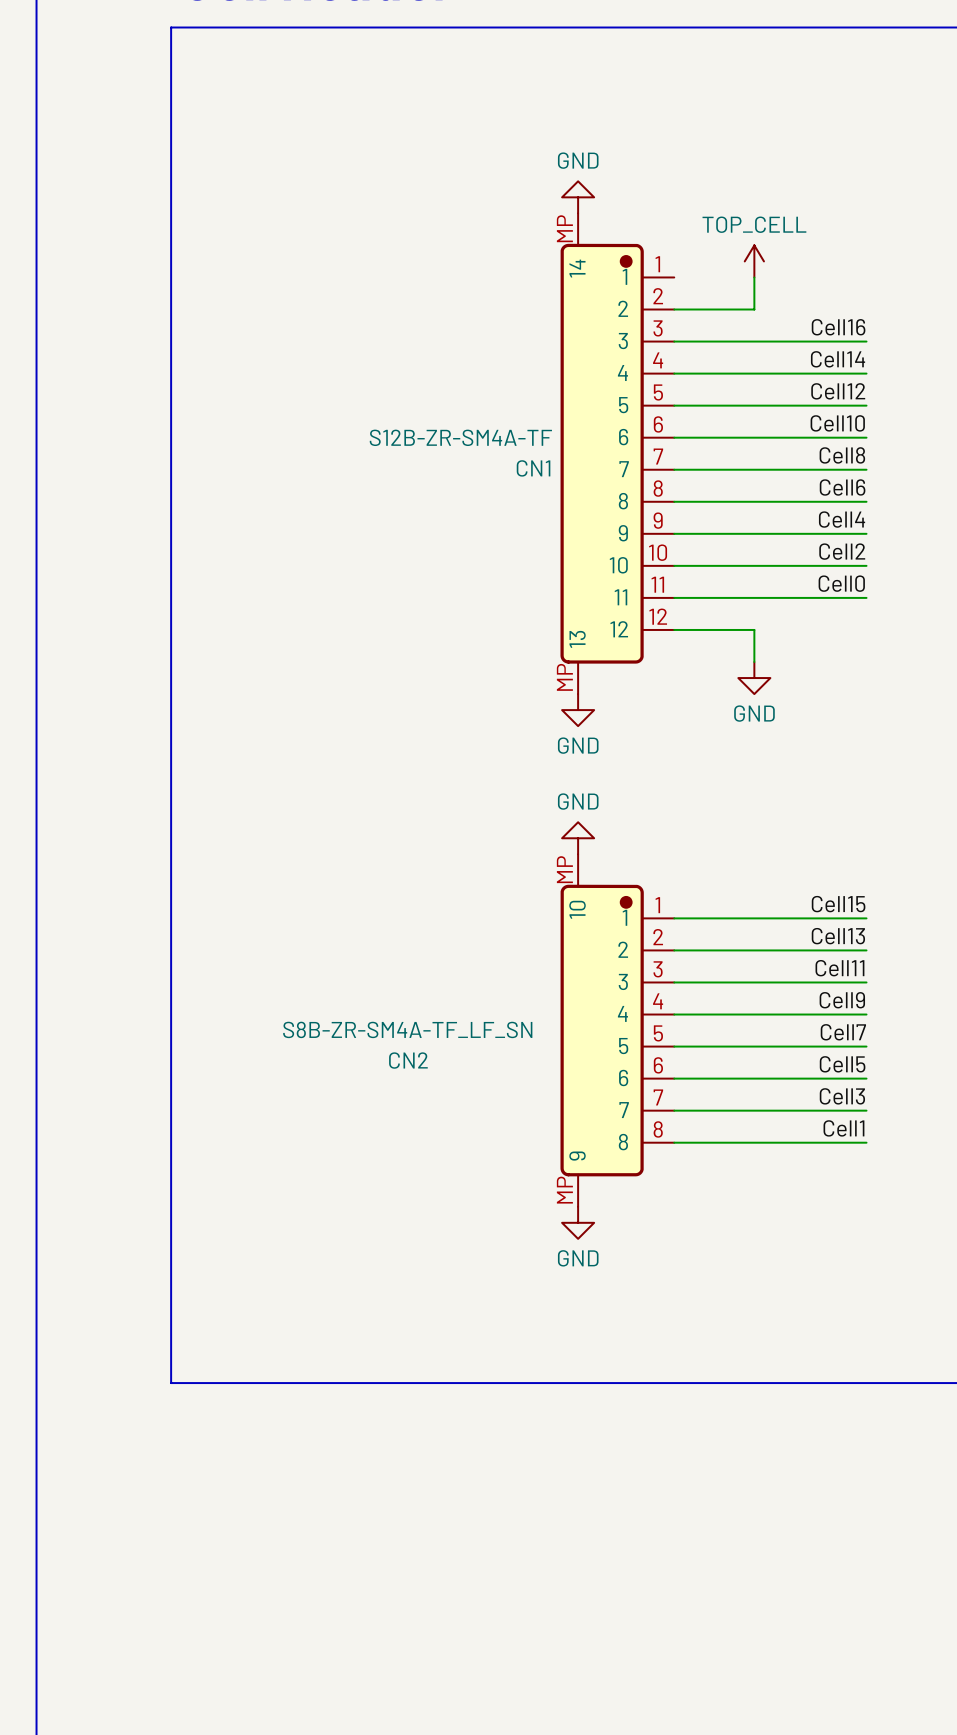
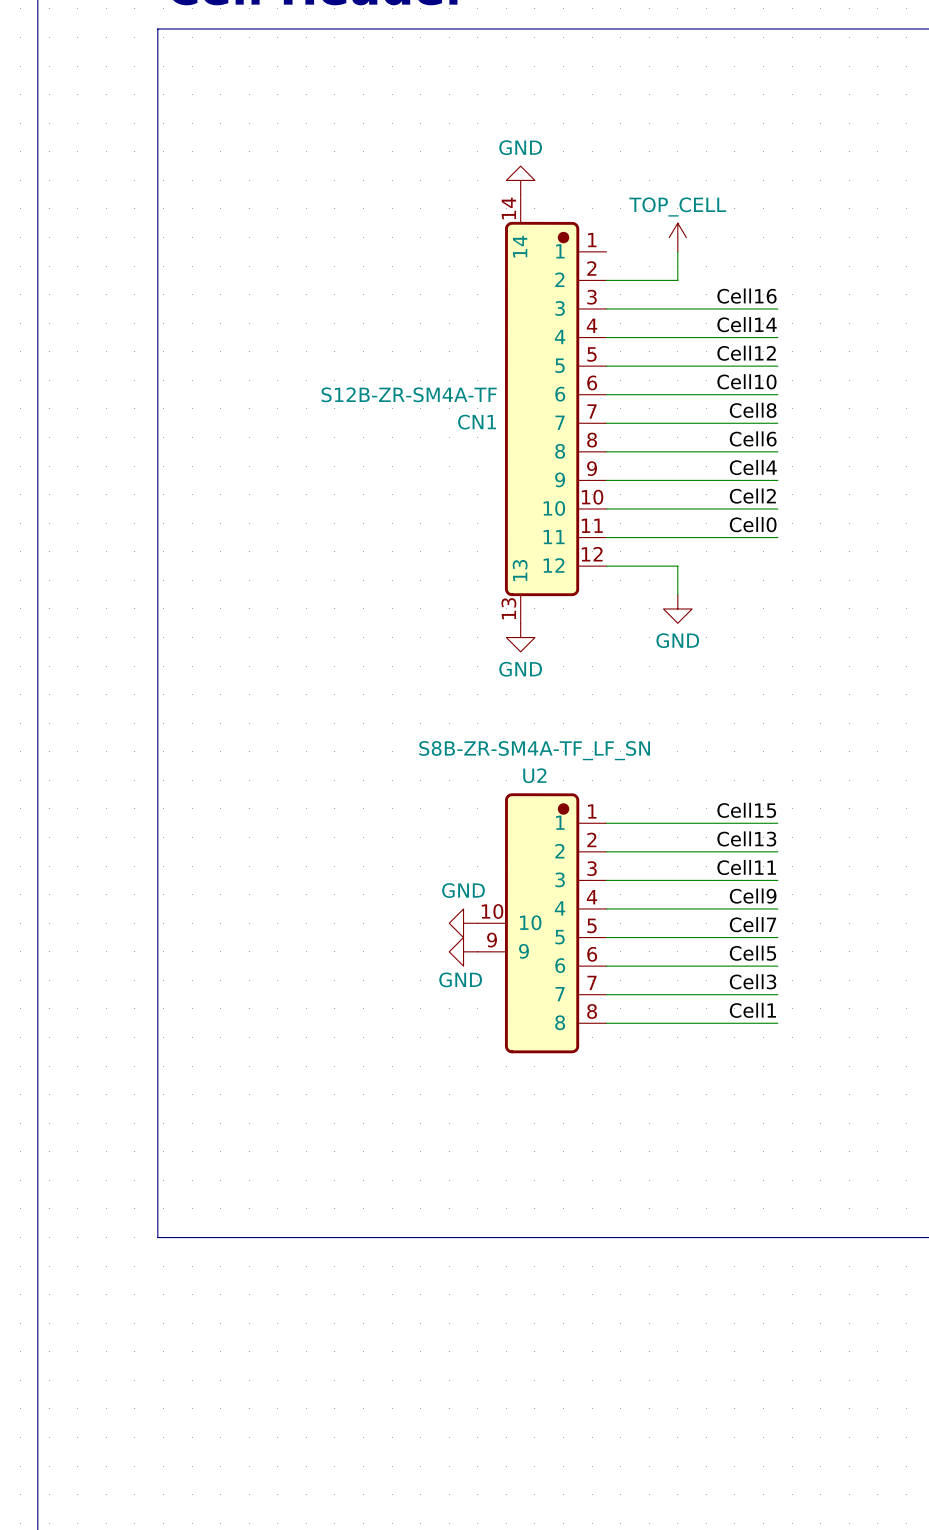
CN1 pin number: MP (564, 228) -> 14 (508, 208)
CN1 pin number: MP (564, 677) -> 13 (508, 608)
power symbol: GND (578, 838) -> none
power symbol: none -> GND (463, 923)
U2: none -> S8B-ZR-SM4A-TF_LF_SN (542, 923)
CN2: S8B-ZR-SM4A-TF_LF_SN (617, 1030) -> none
power symbol: none -> GND (463, 951)
power symbol: GND (578, 1222) -> none

